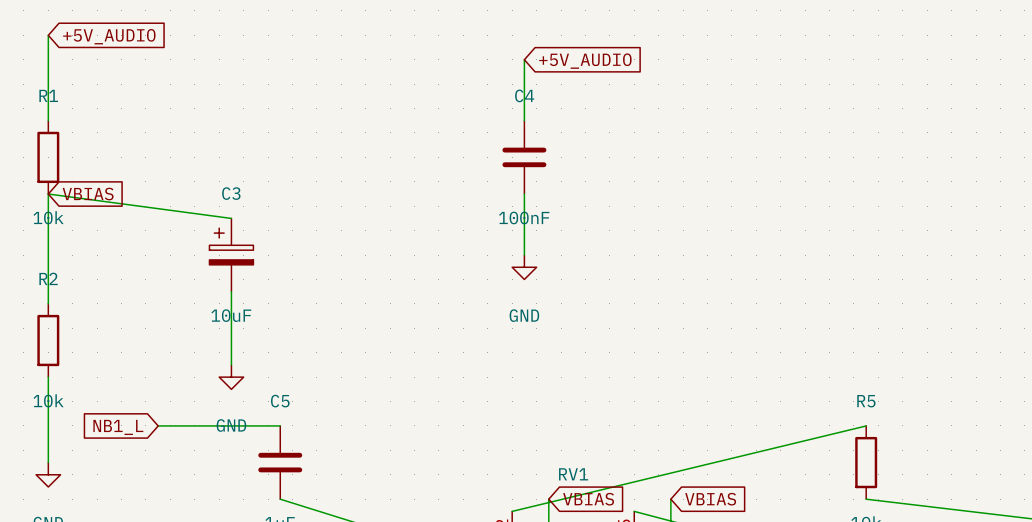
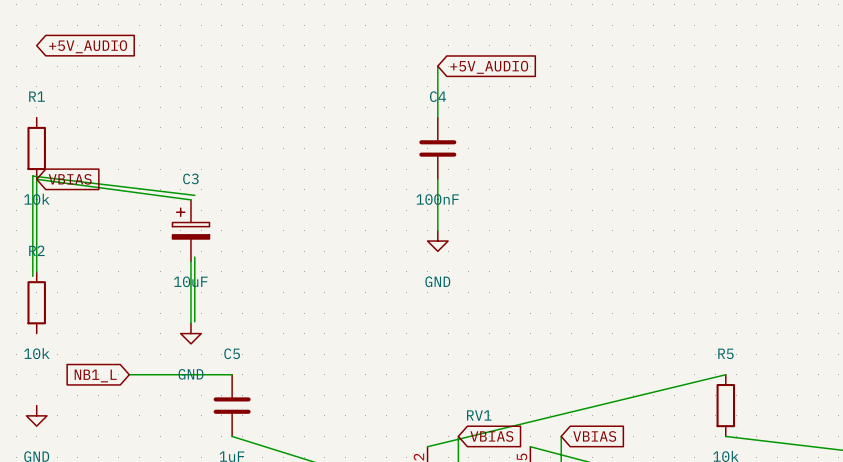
wire: (48, 35) (48, 120) -> none
wire: none -> (194, 195) (32, 176) (32, 276)
wire: none -> (194, 257) (194, 321)
wire: (48, 377) (48, 462) -> none

